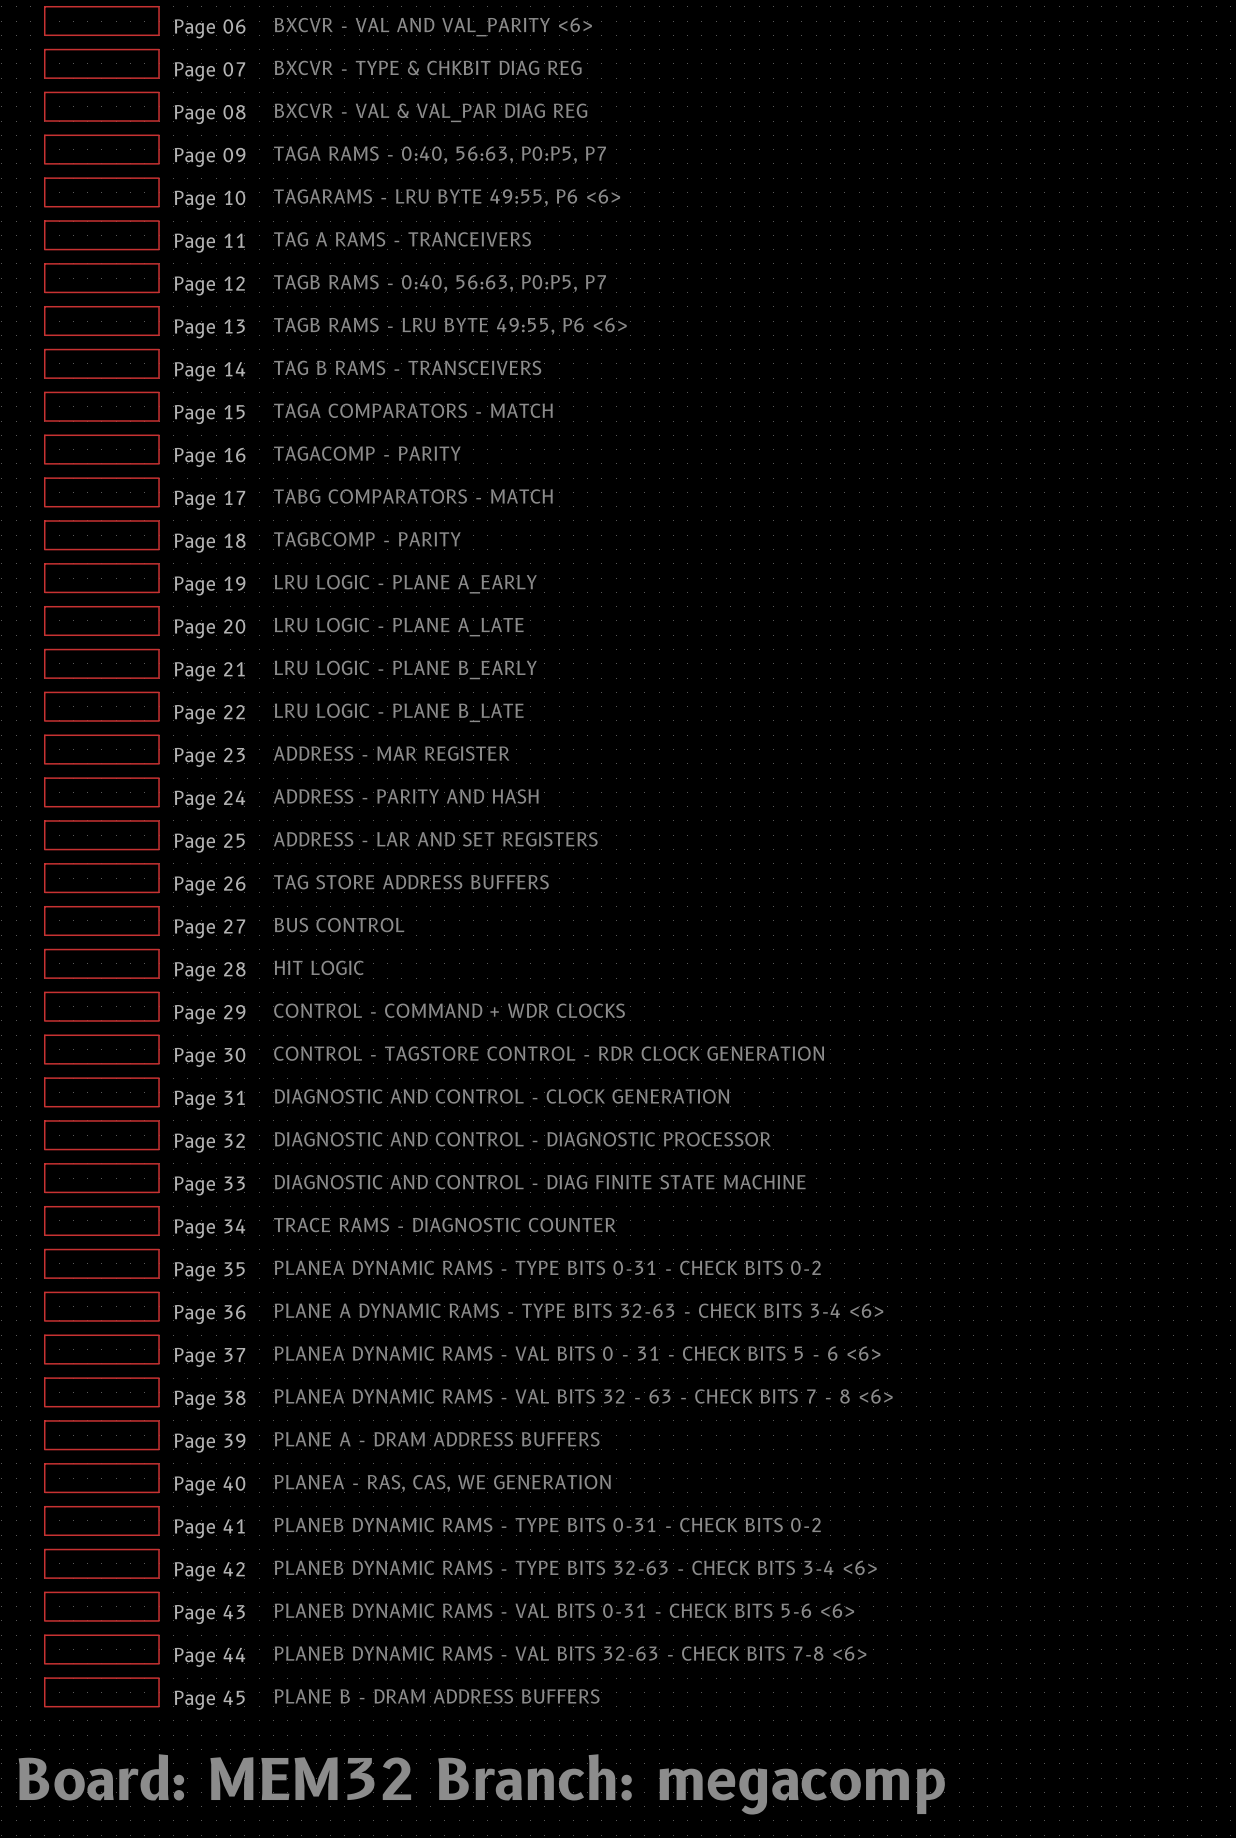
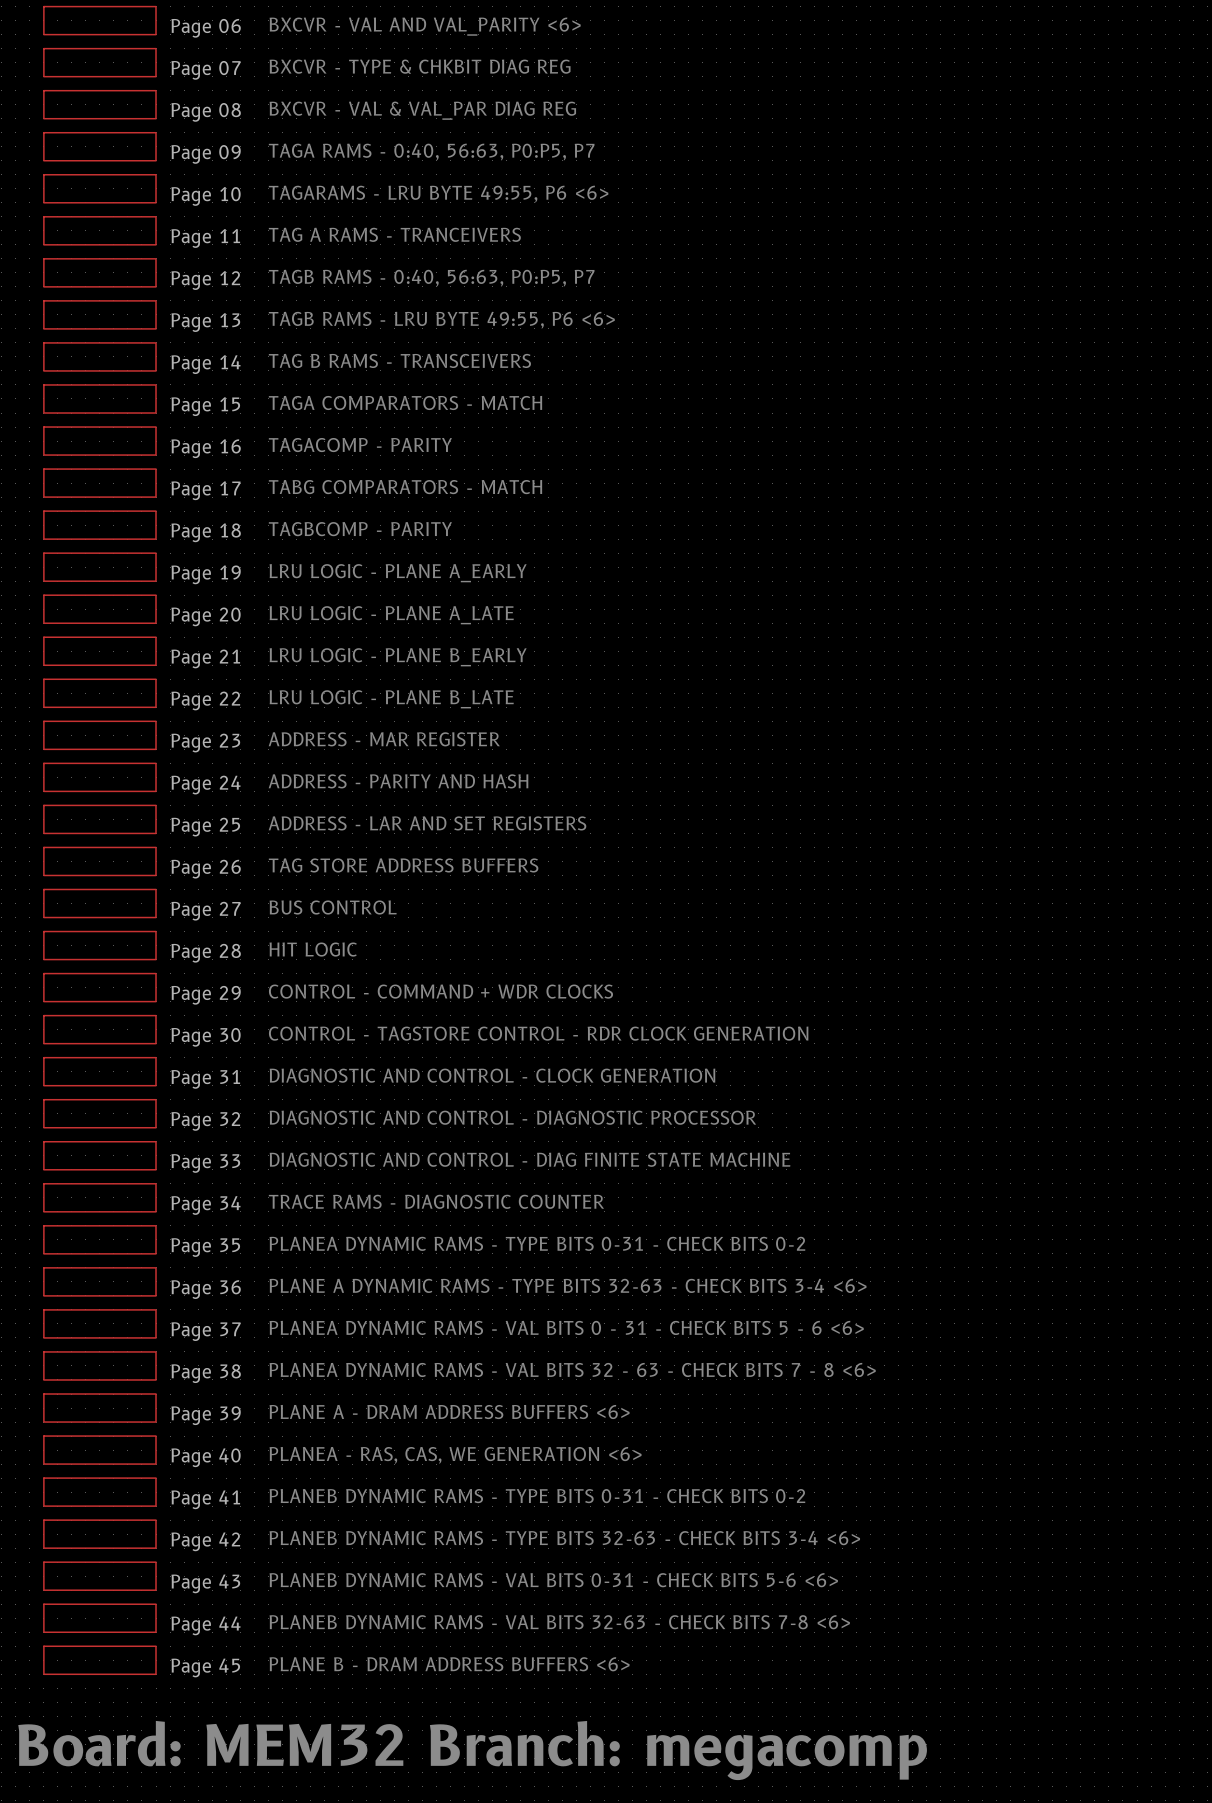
text: PLANE A - DRAM ADDRESS BUFFERS (437, 1439) -> PLANE A - DRAM ADDRESS BUFFERS <6> (449, 1412)
text: PLANEA - RAS, CAS, WE GENERATION (442, 1483) -> PLANEA - RAS, CAS, WE GENERATION <6> (455, 1455)
text: PLANE B - DRAM ADDRESS BUFFERS (437, 1696) -> PLANE B - DRAM ADDRESS BUFFERS <6> (449, 1664)

